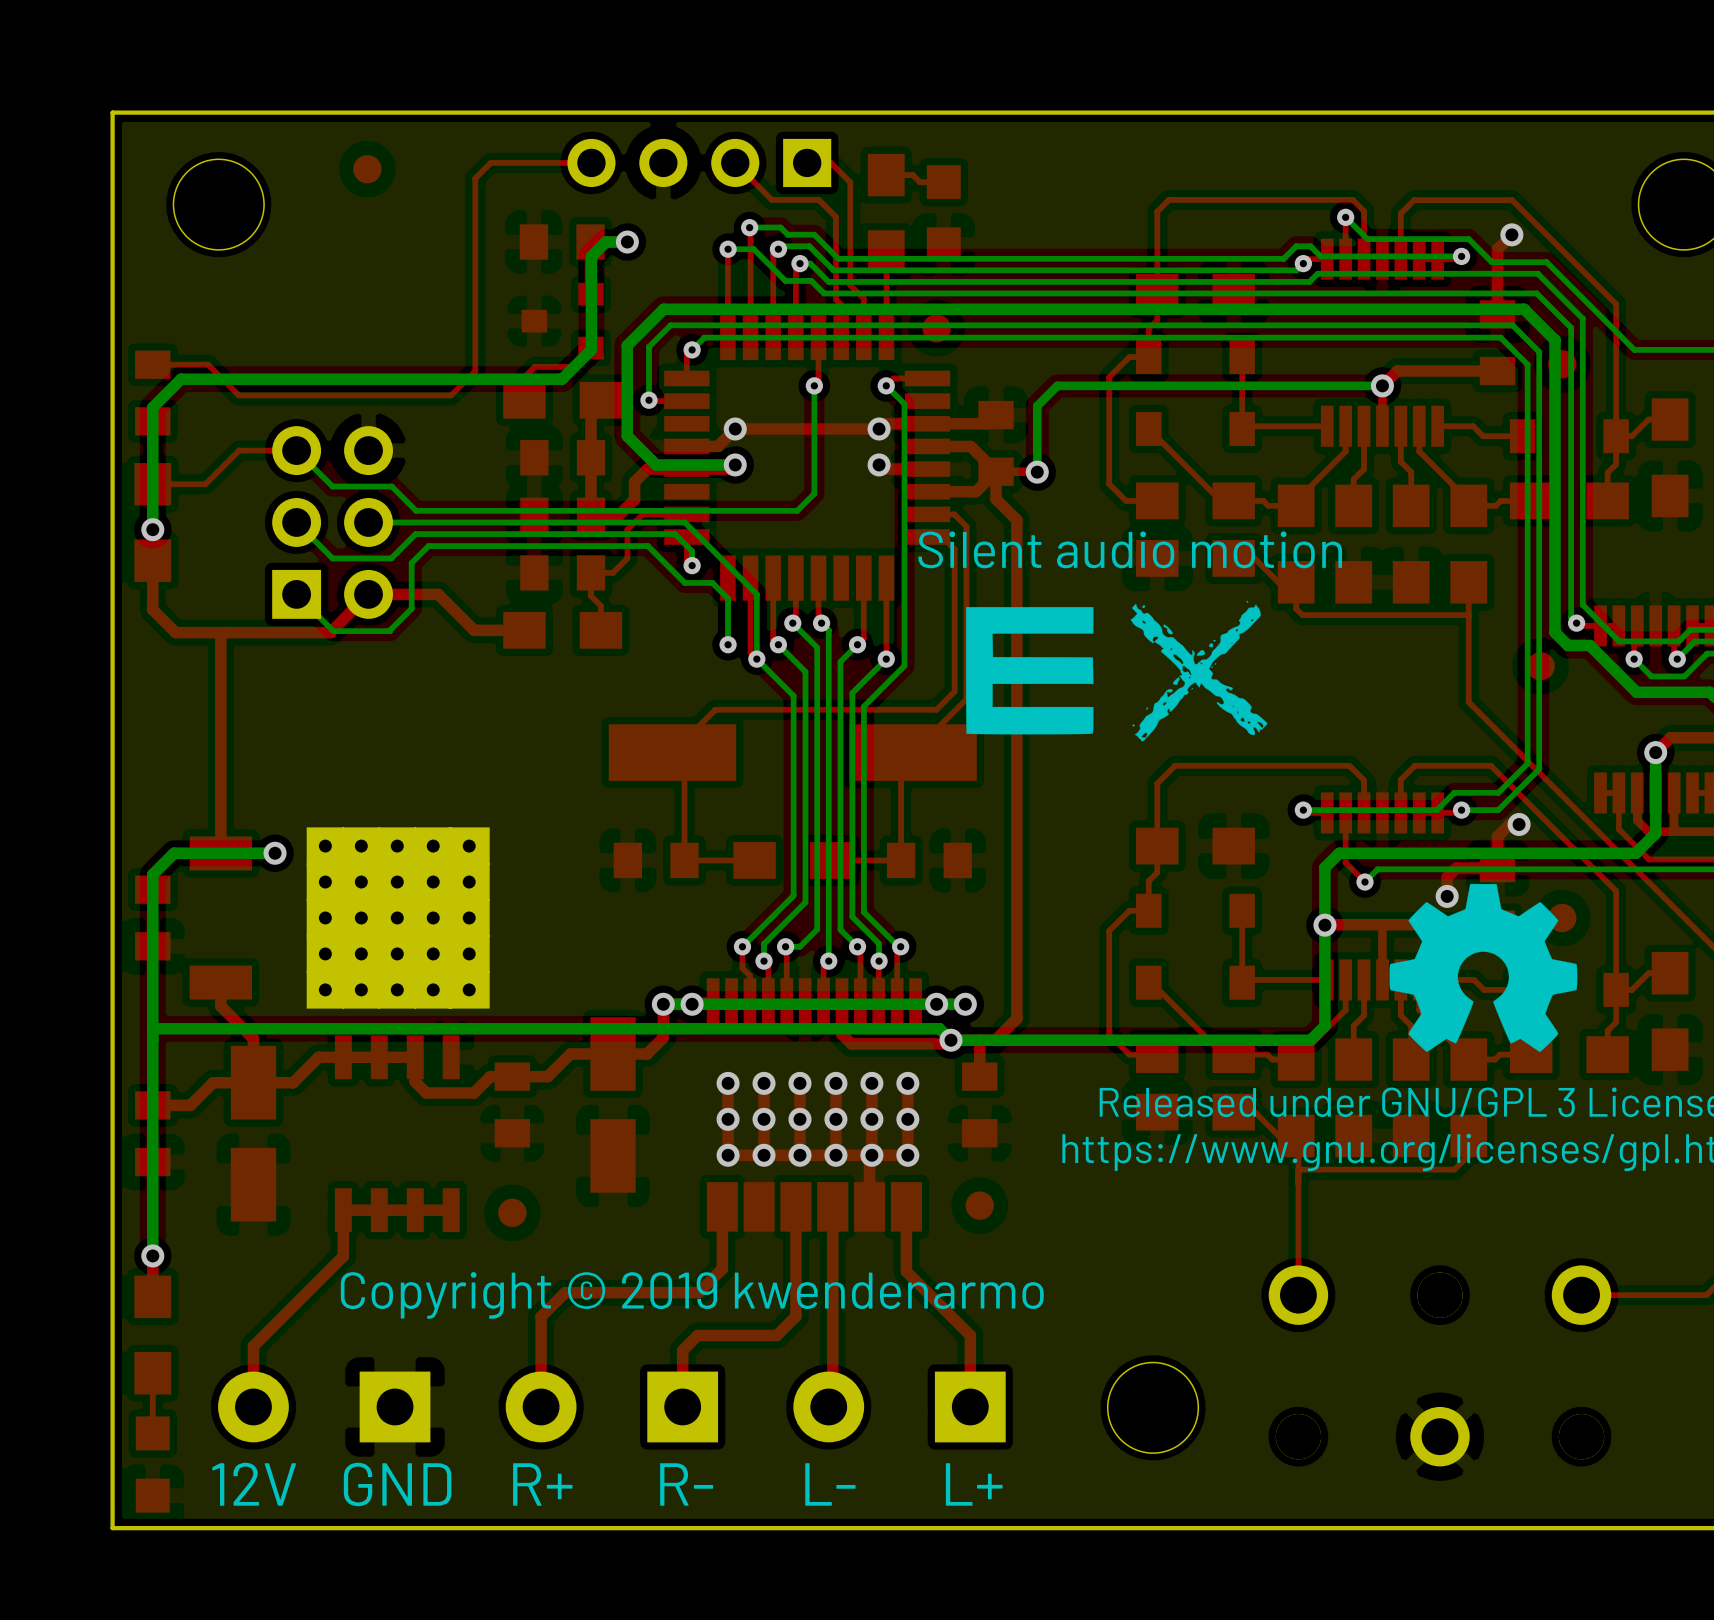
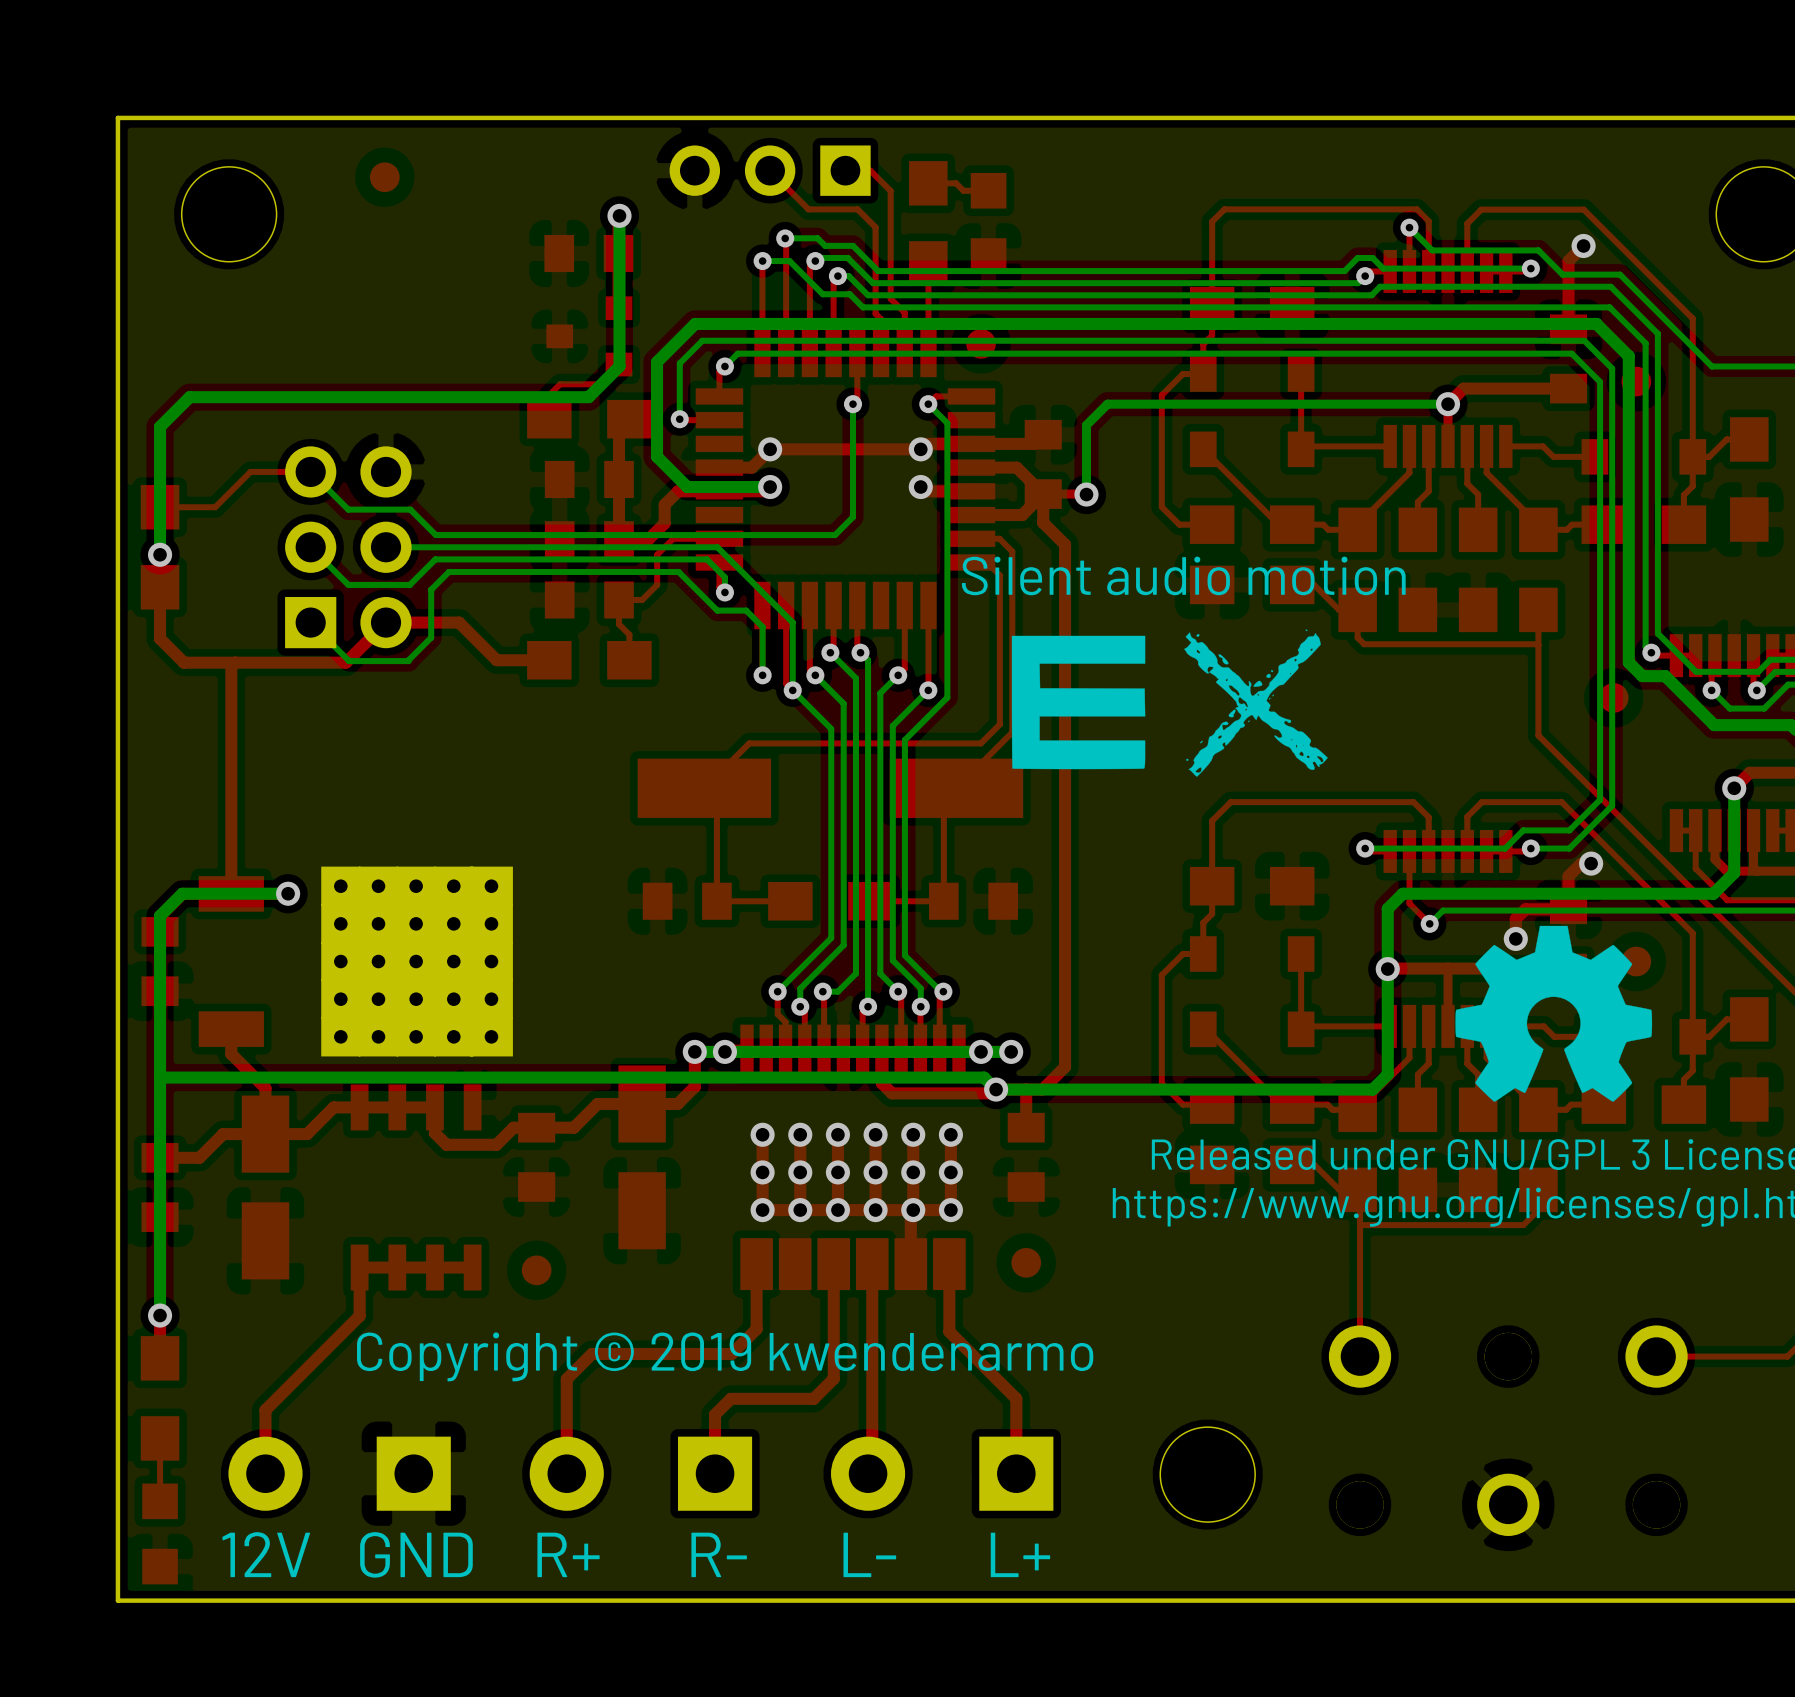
top track: (591, 162) (490, 162) (475, 178) (475, 371) (451, 395) (238, 395) (208, 364) (152, 364) -> none
part: (699, 162) -> none
bottom track: (627, 242) (605, 242) (591, 256) -> (619, 215) (619, 268)
via position: (627, 242) -> (619, 215)
part: (152, 393) -> none

